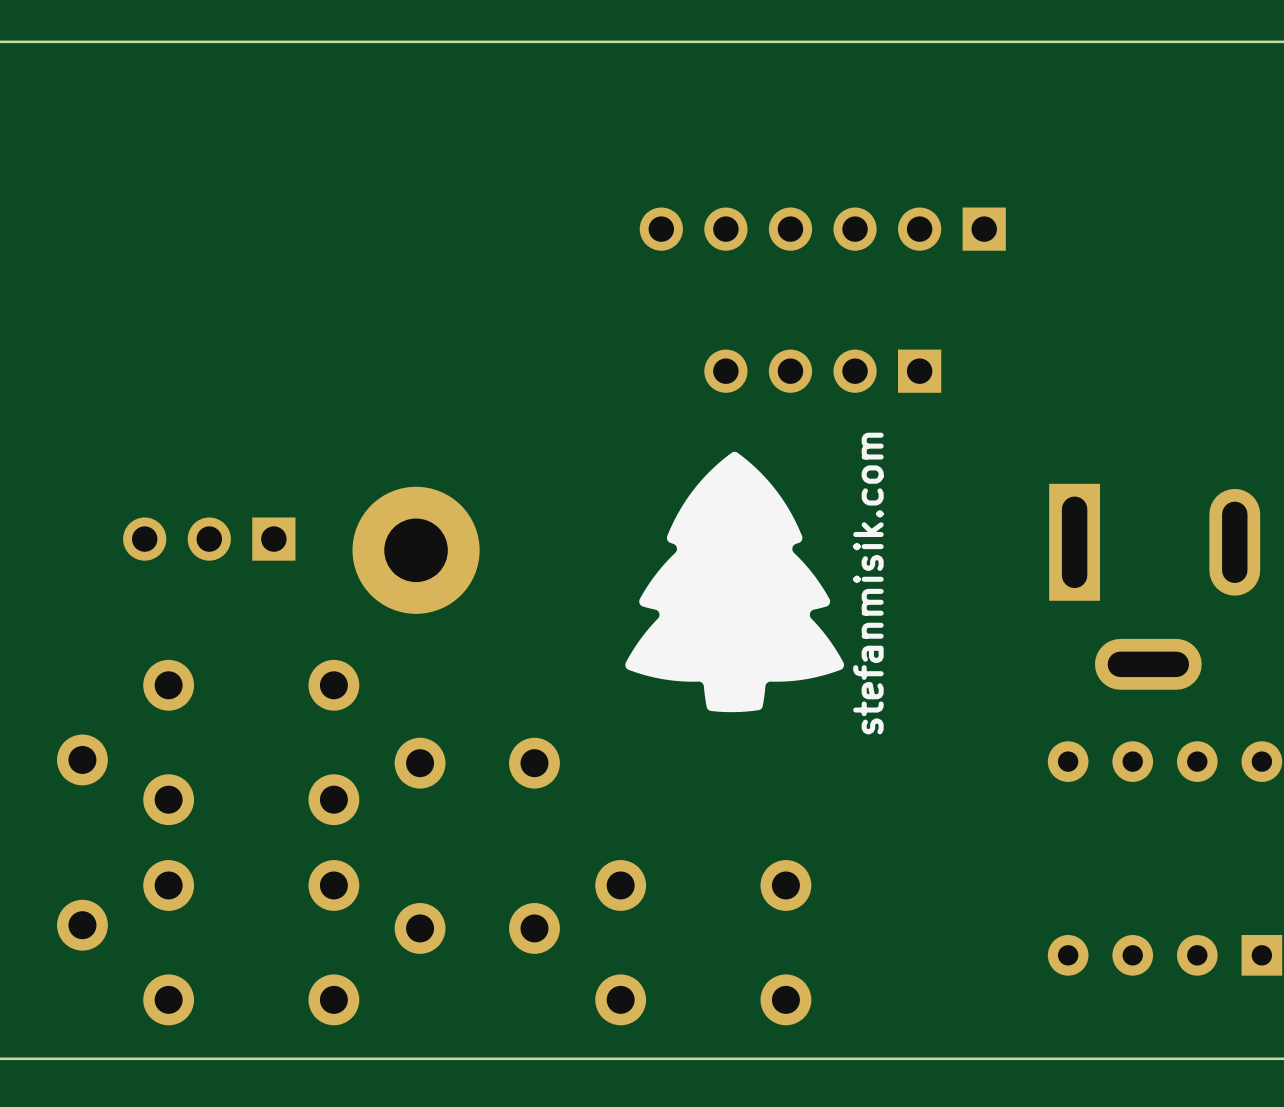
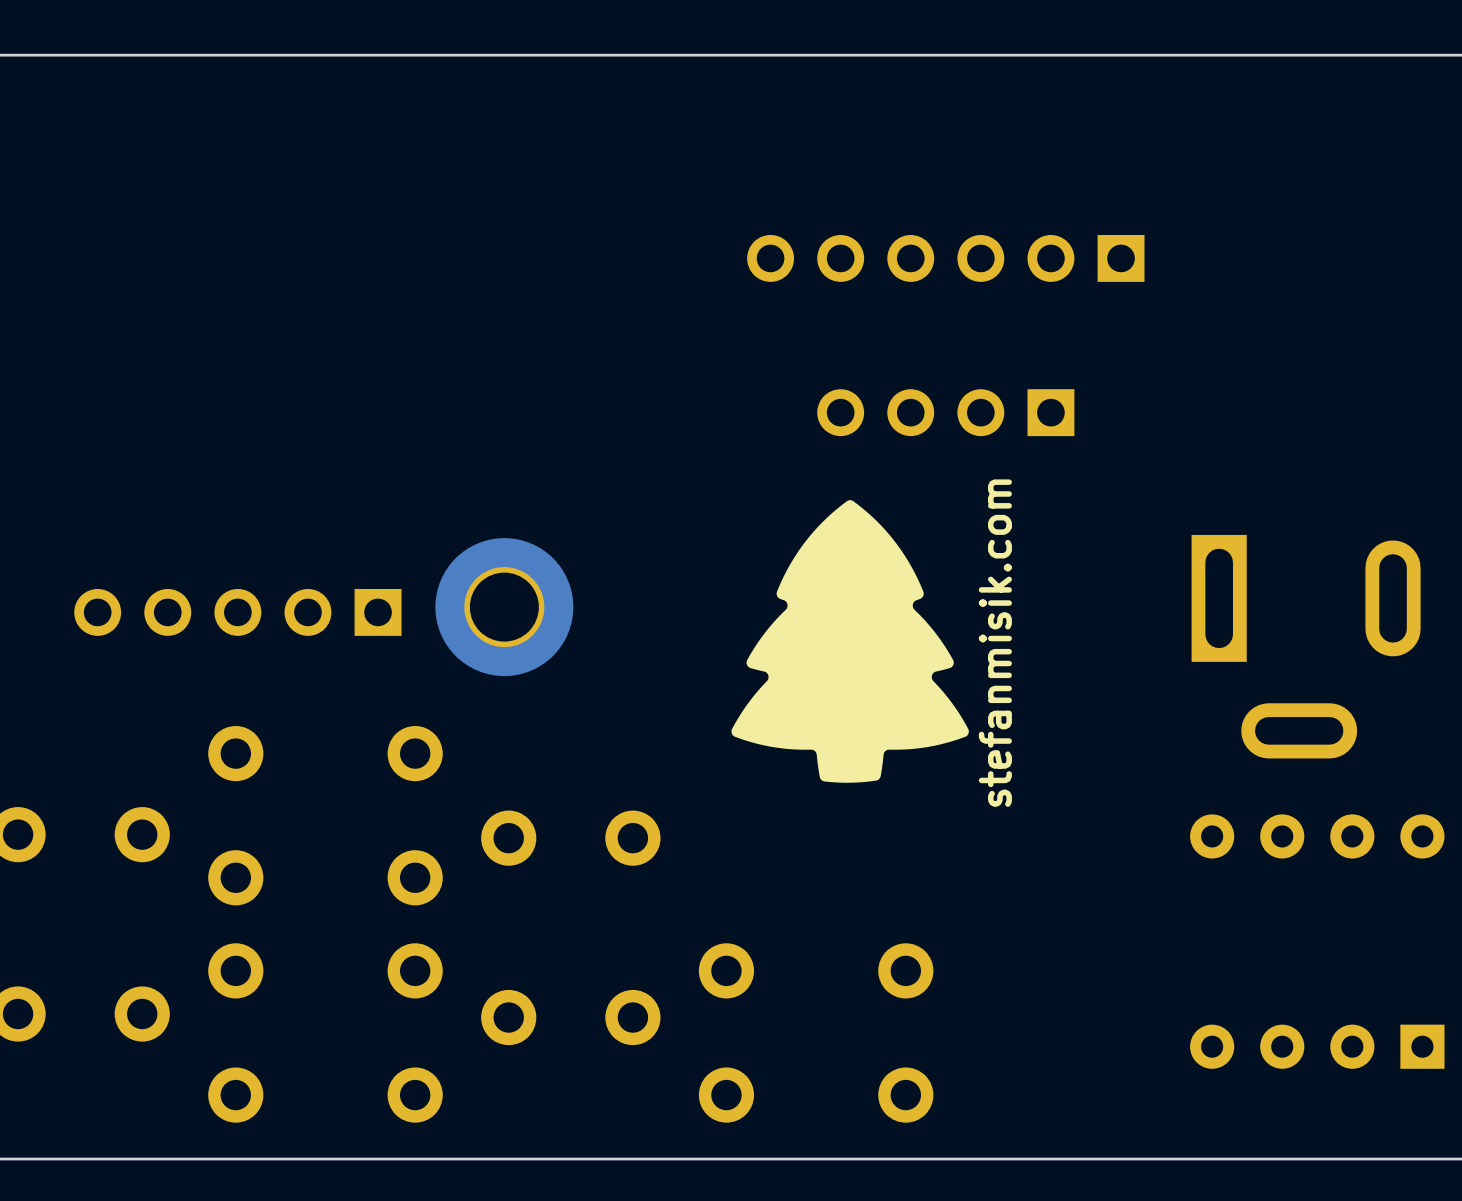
part: (209, 539) -> none
part: none -> (237, 612)

